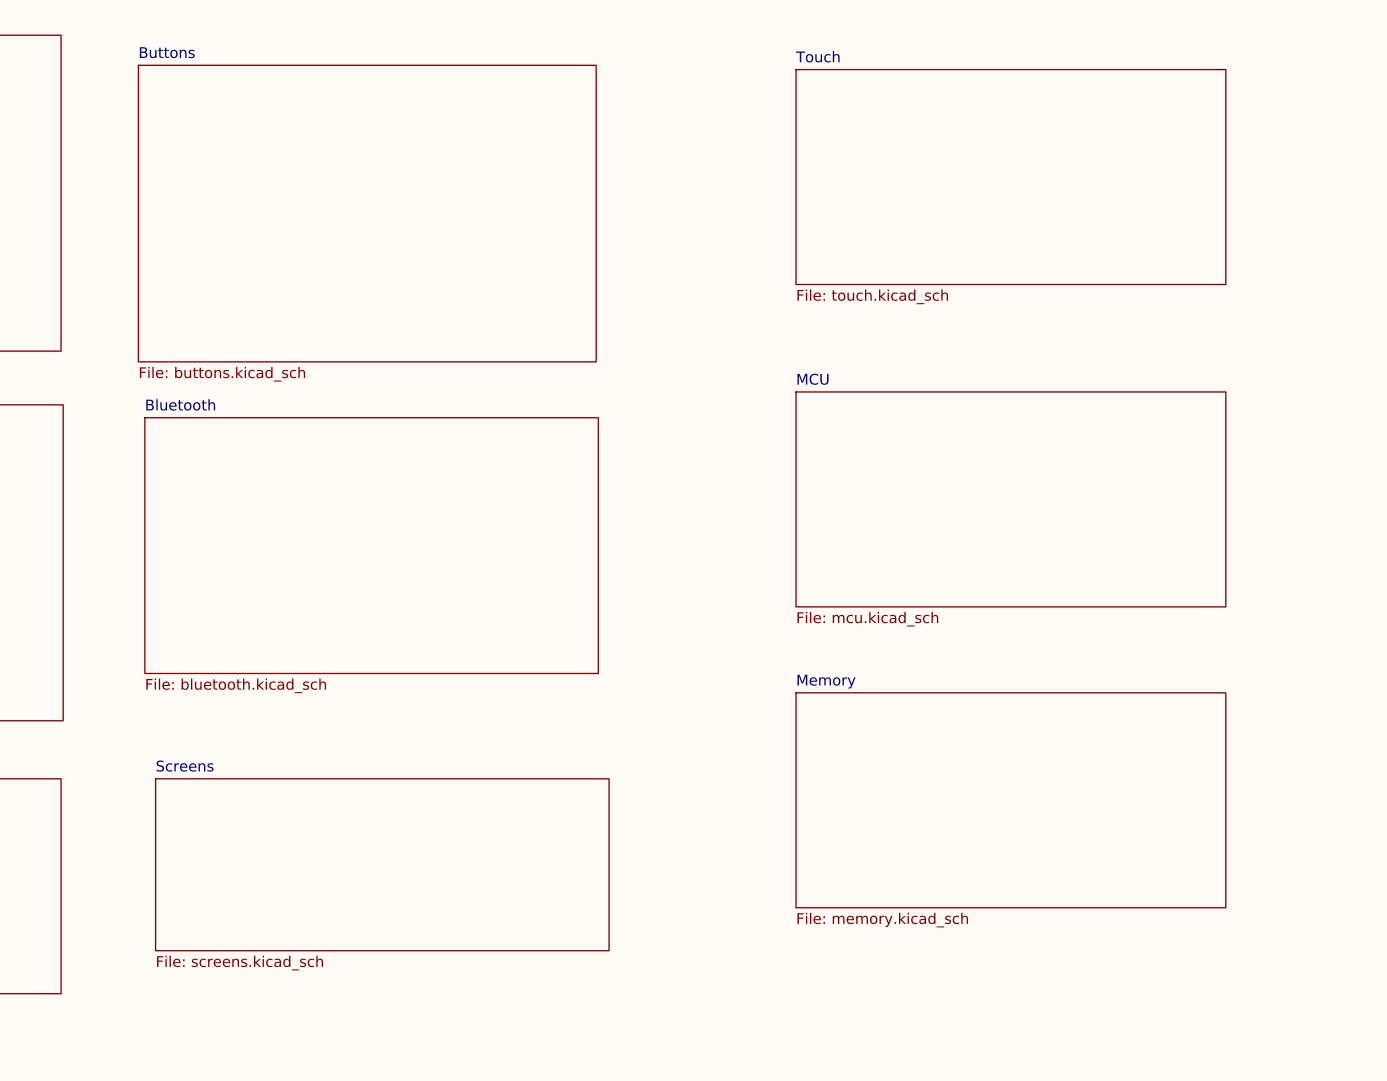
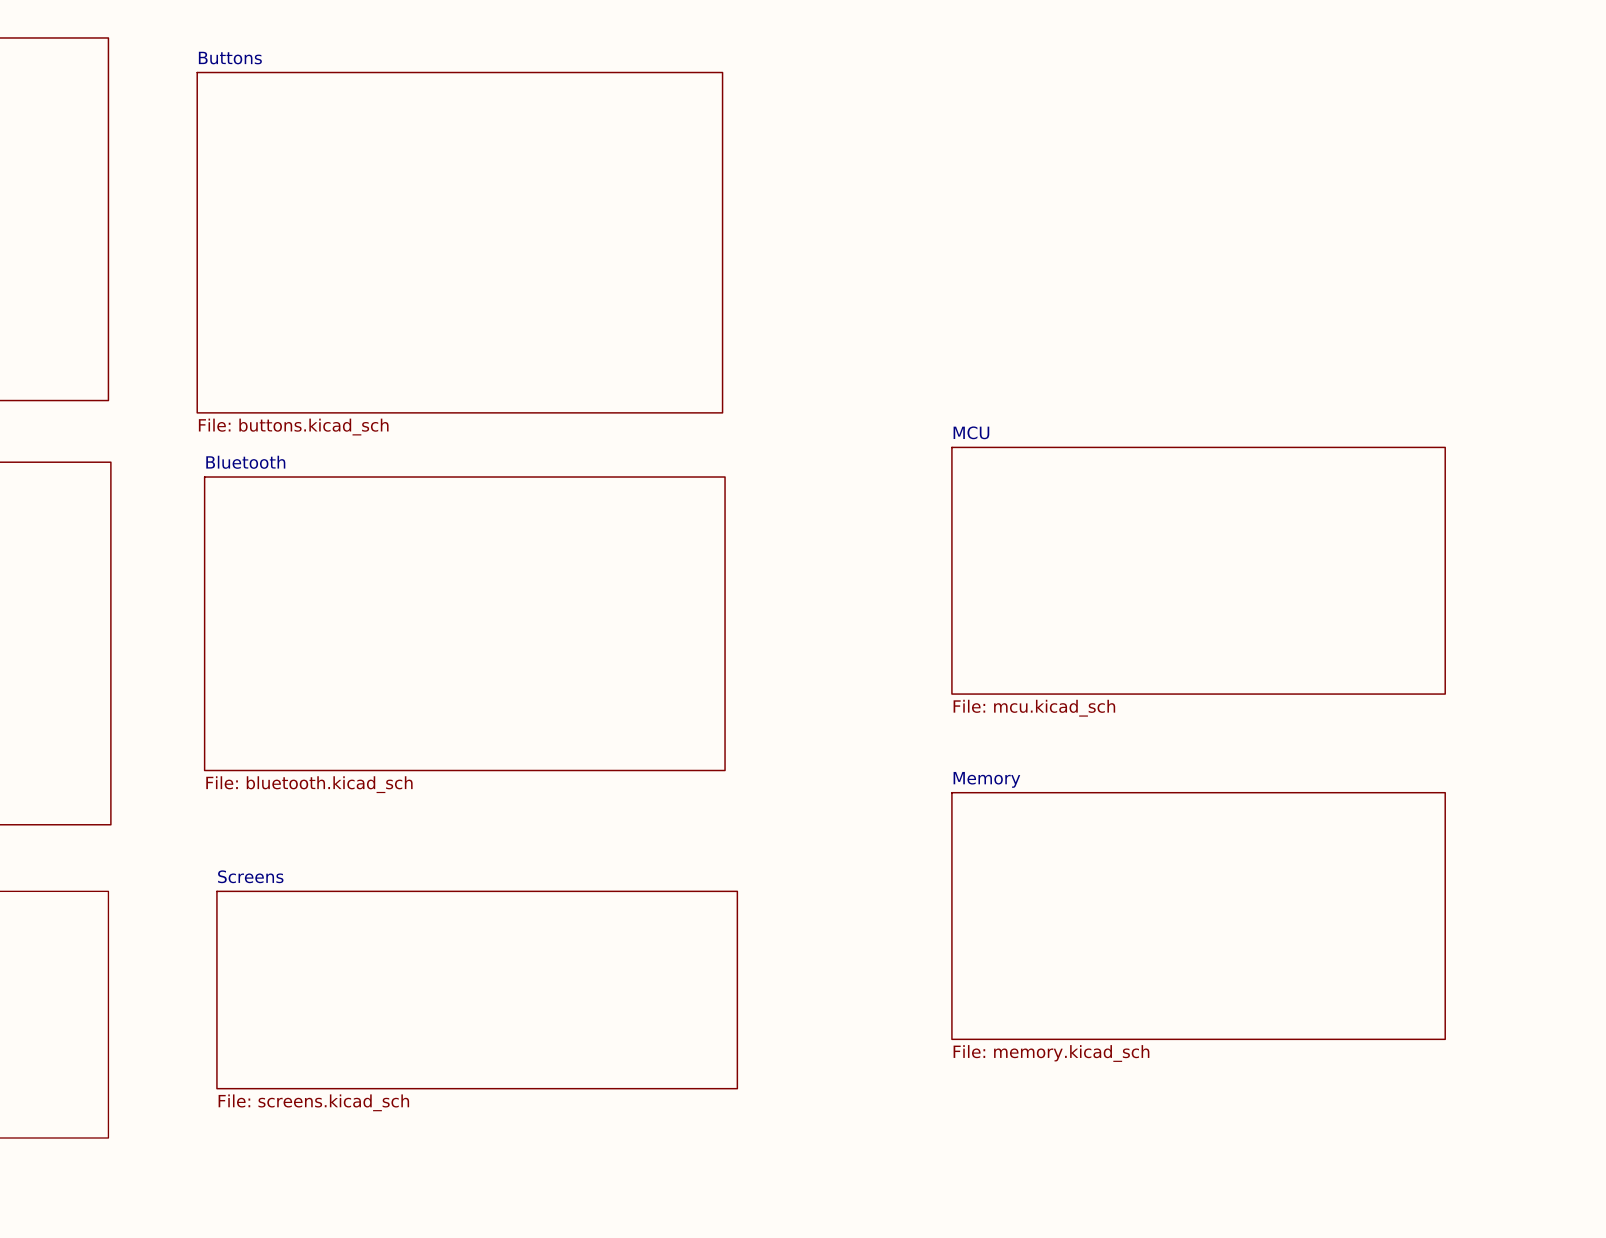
sheet Touch: File: touch.kicad_sch (1010, 177) -> none

